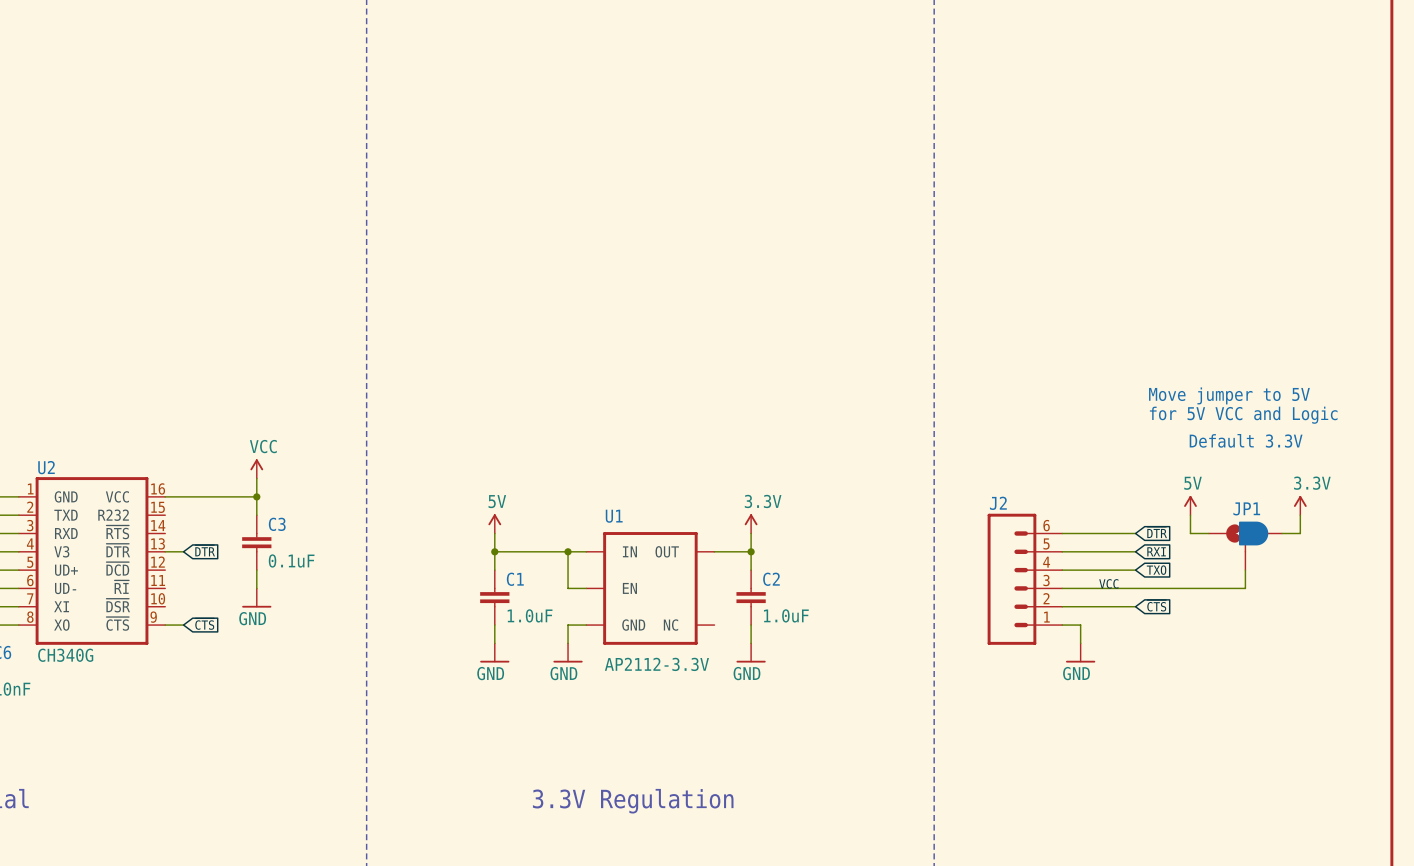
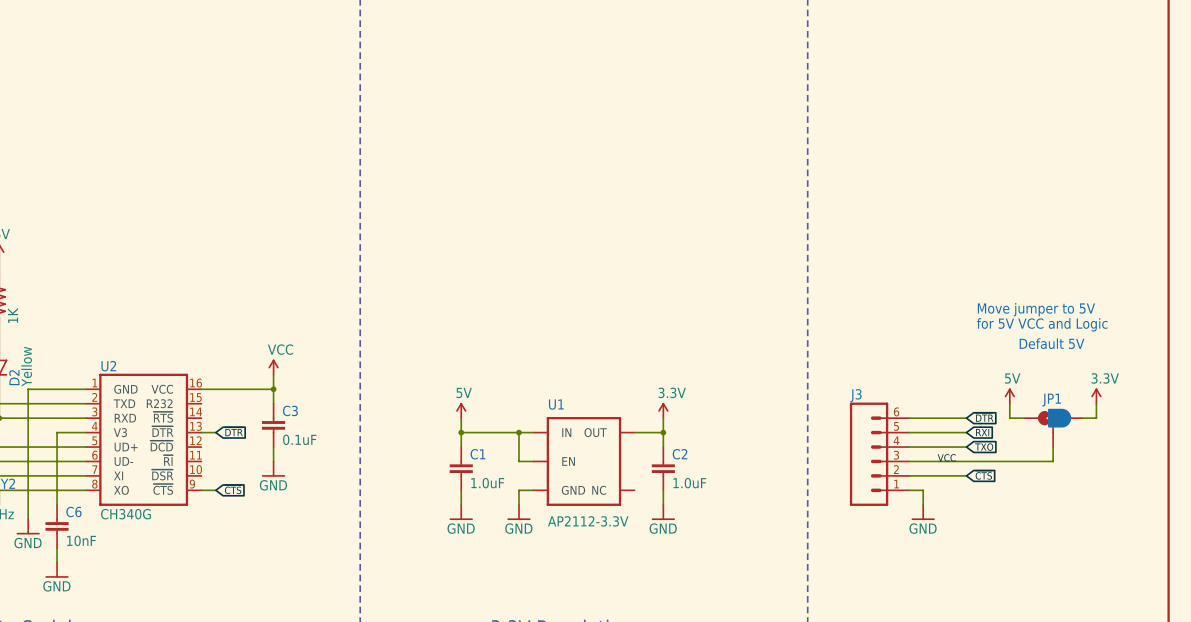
text: Default 3.3V (1246, 440) -> Default 5V (1052, 343)
J2 name: J2 (998, 503) -> J3 (856, 395)

